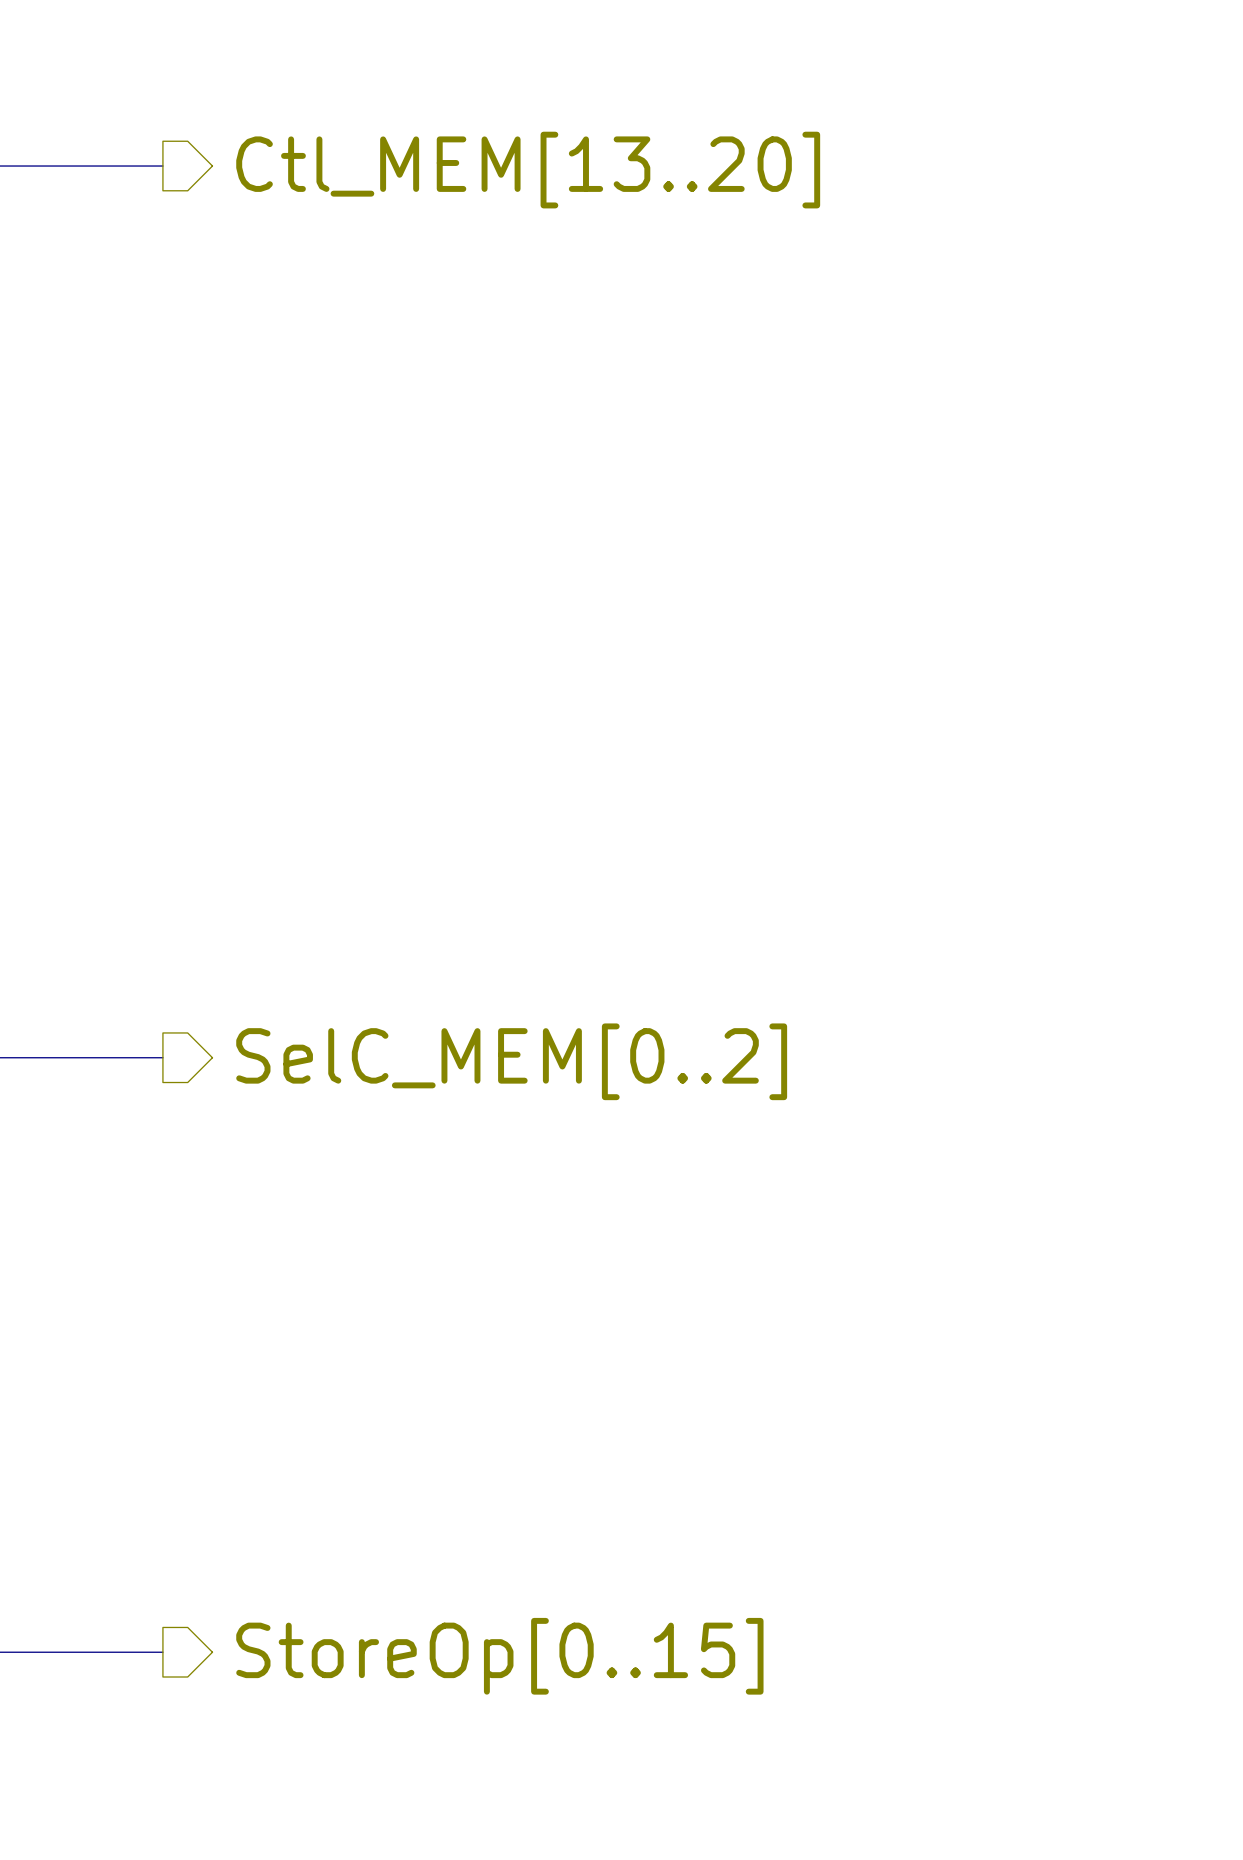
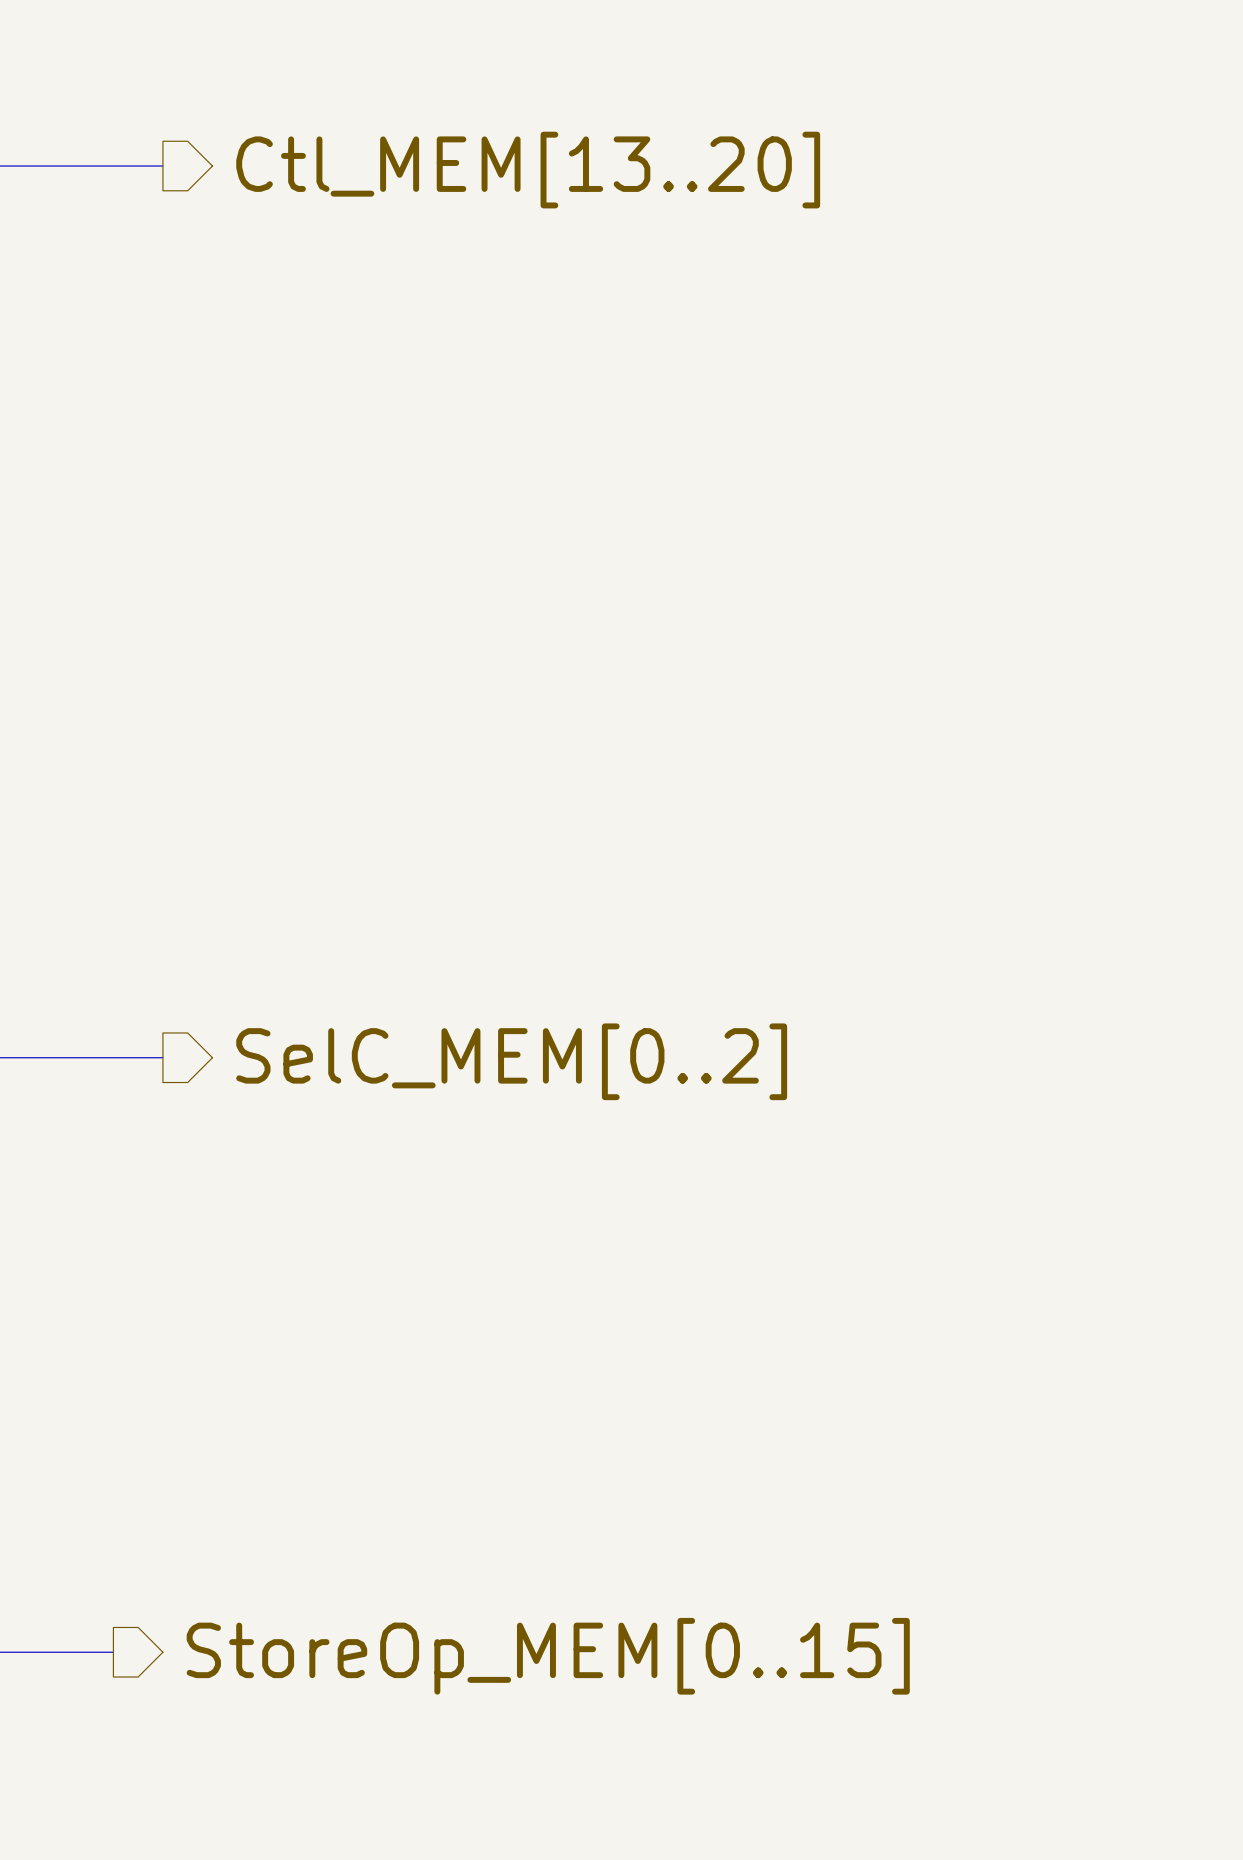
bus: (113, 1652) (162, 1652) -> none
hierarchical label: StoreOp[0..15] (499, 1656) -> StoreOp_MEM[0..15] (548, 1656)

